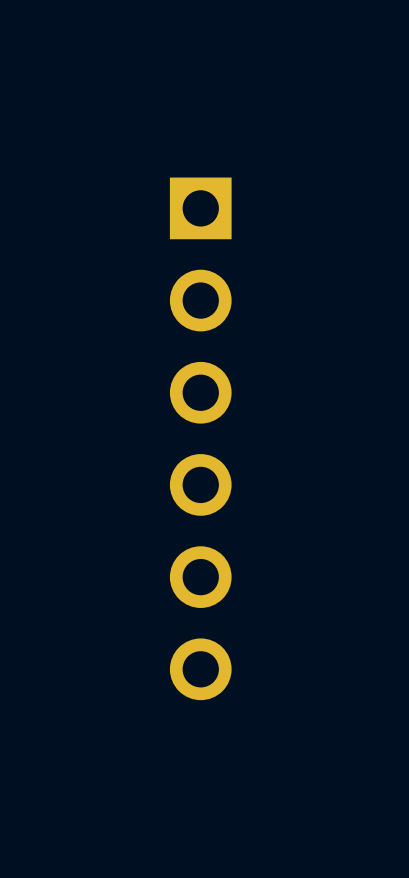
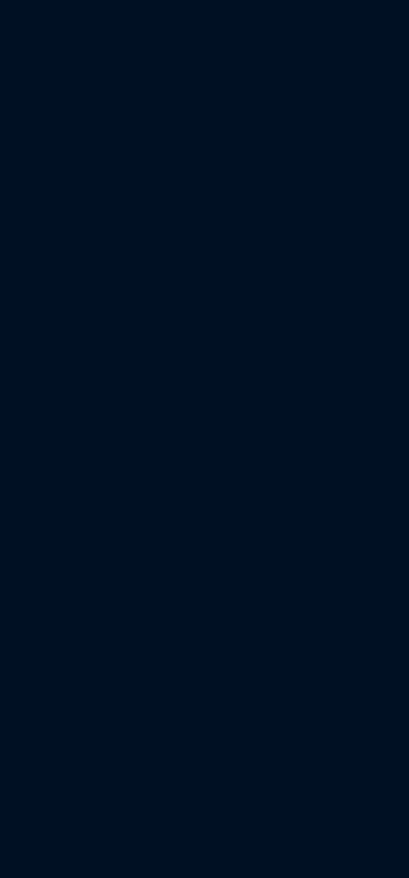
part: (200, 438) -> none

